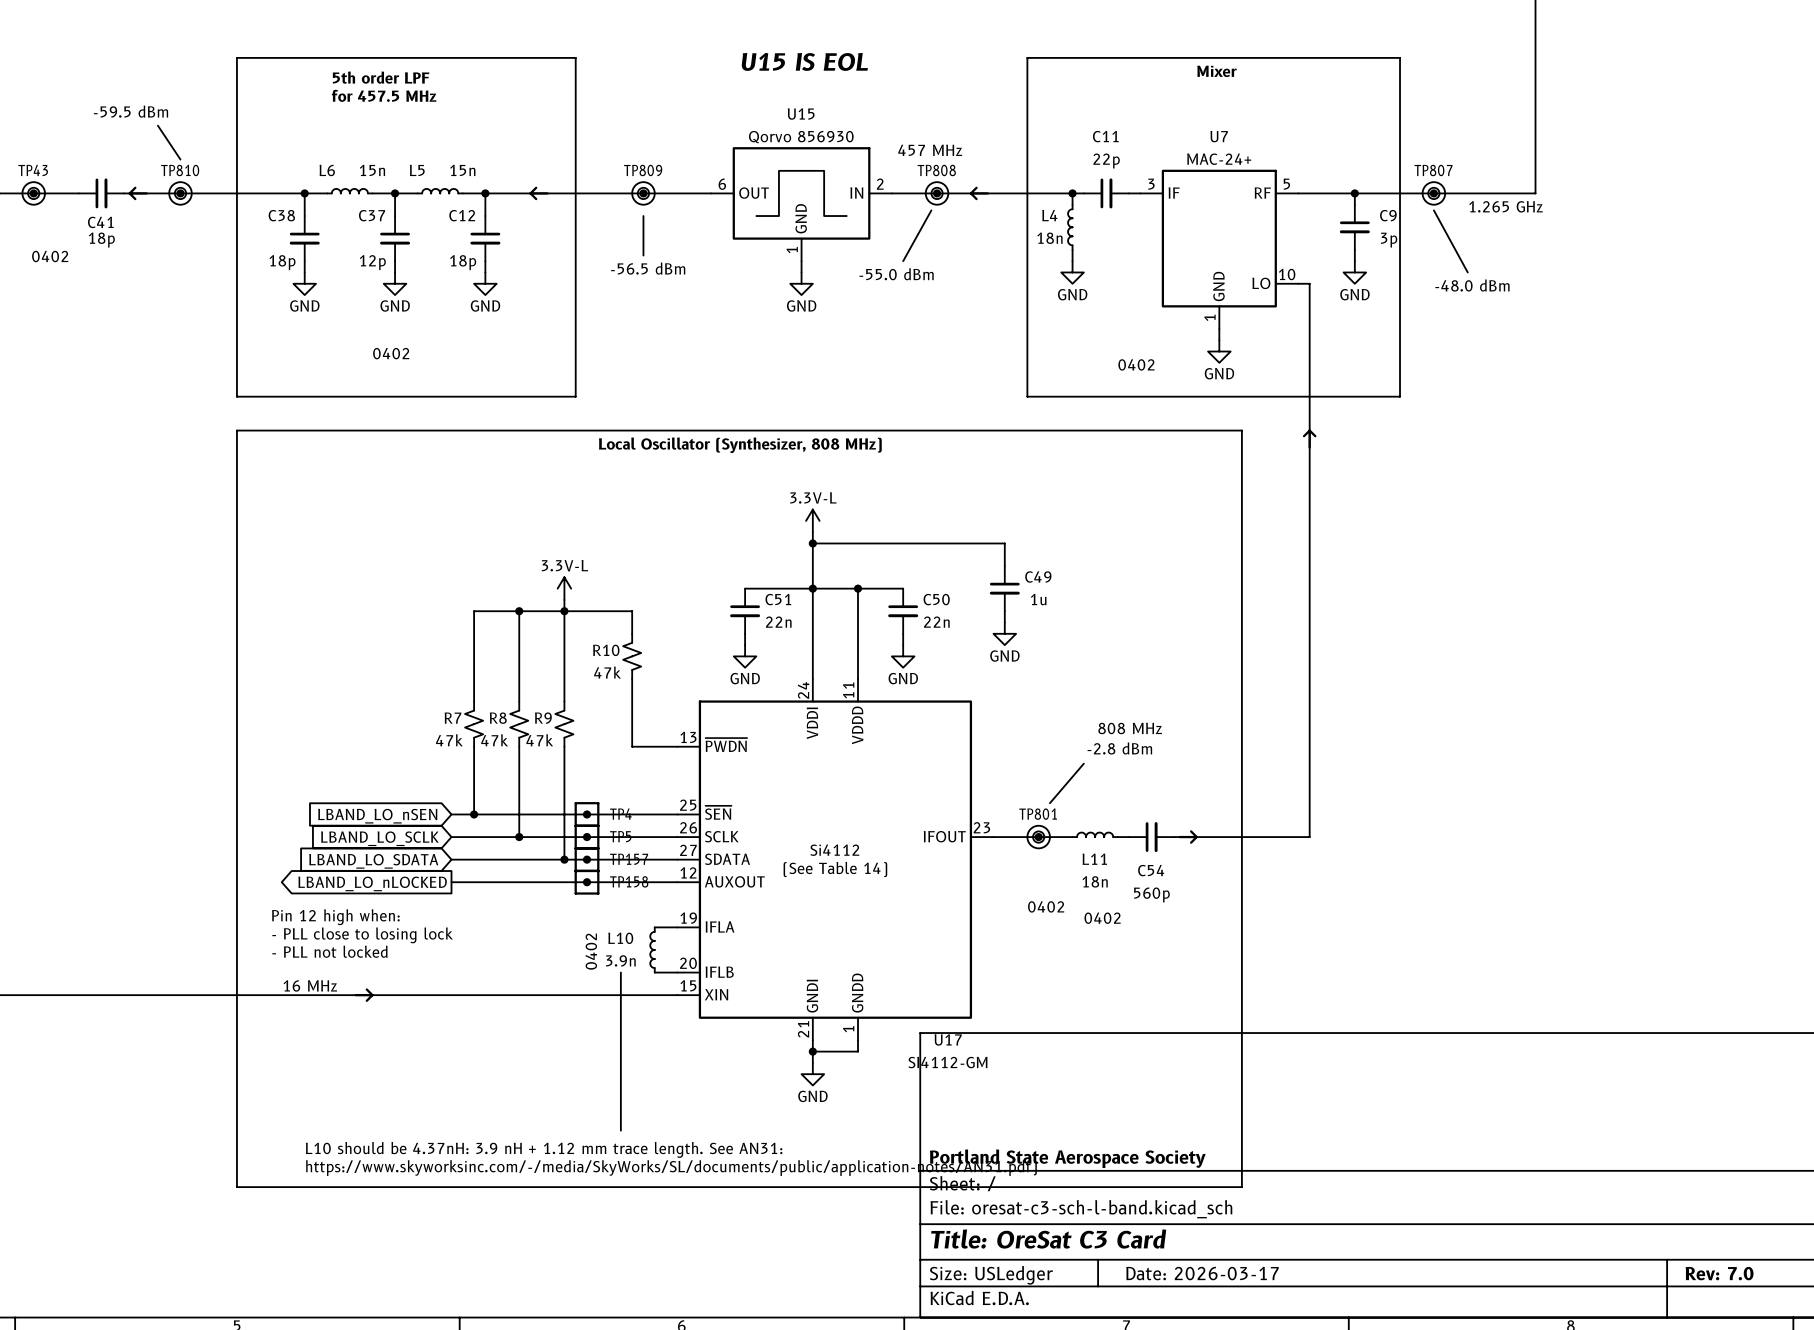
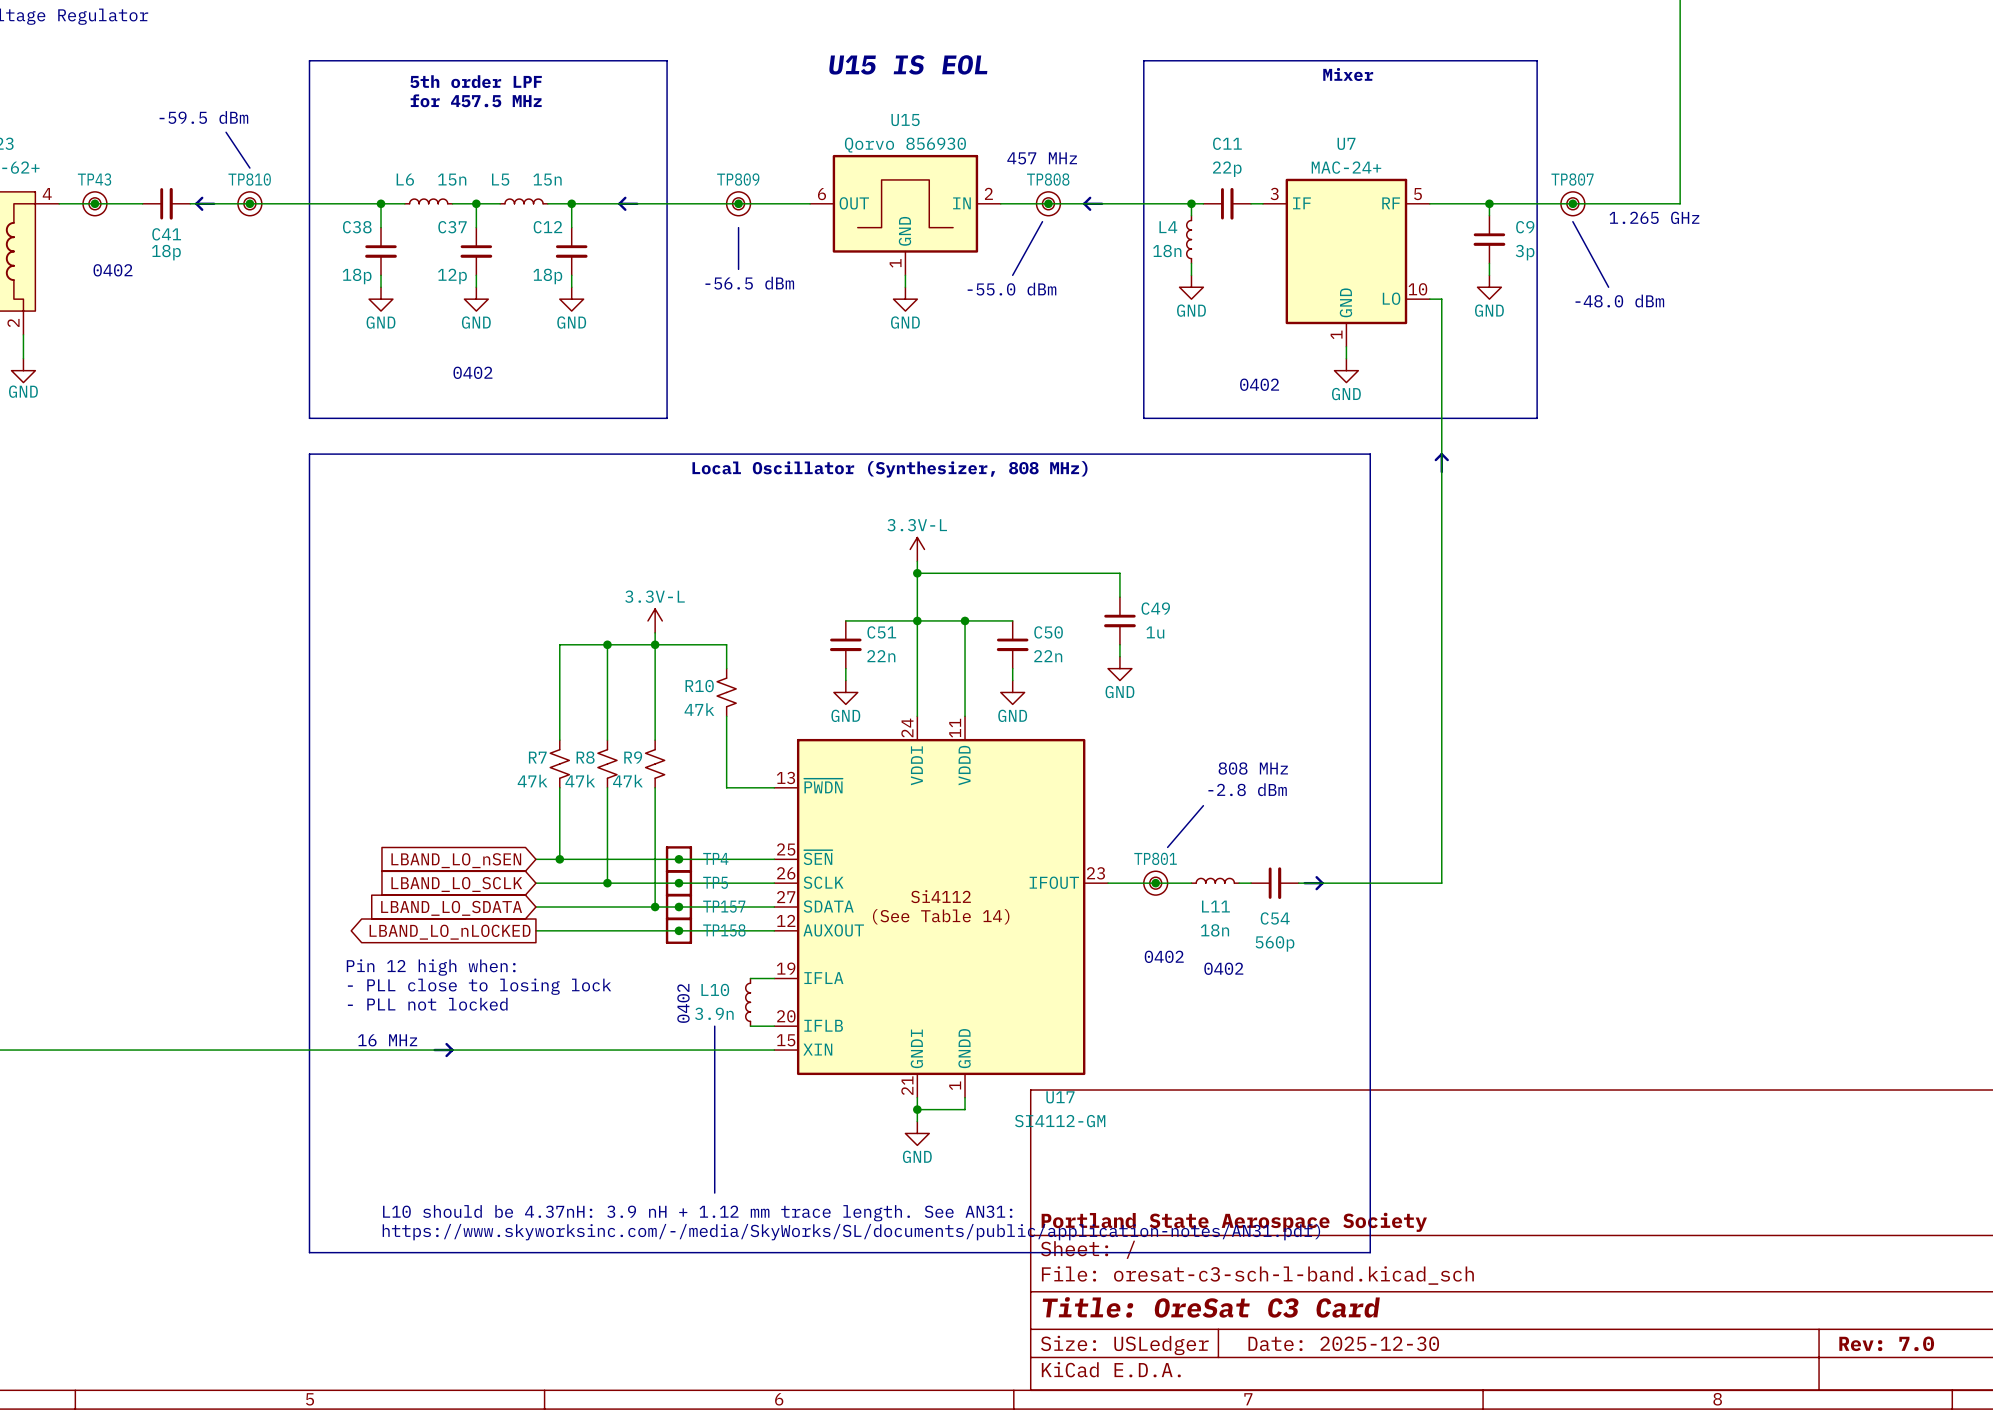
title block: Date: 2026-03-17 (1202, 1273) -> Date: 2025-12-30 (1343, 1343)

